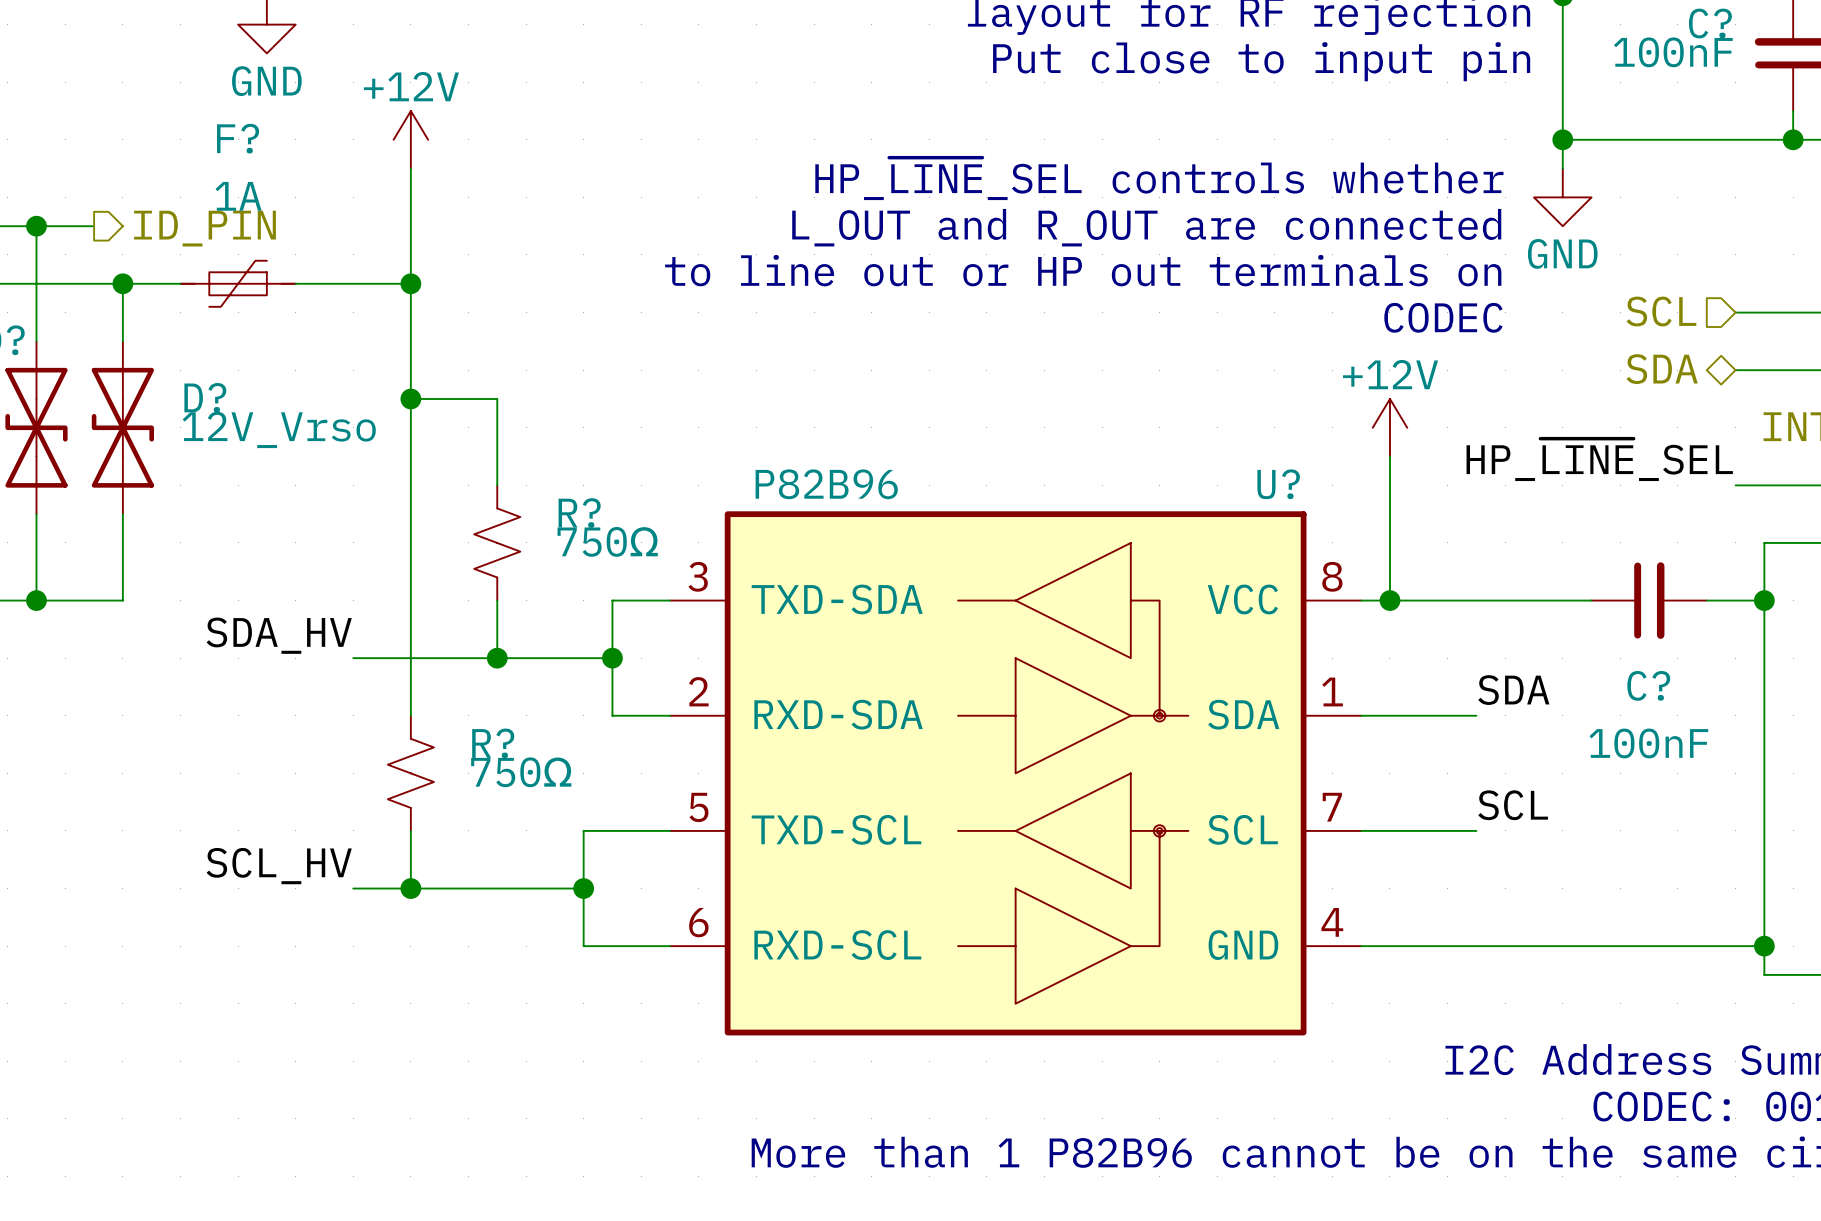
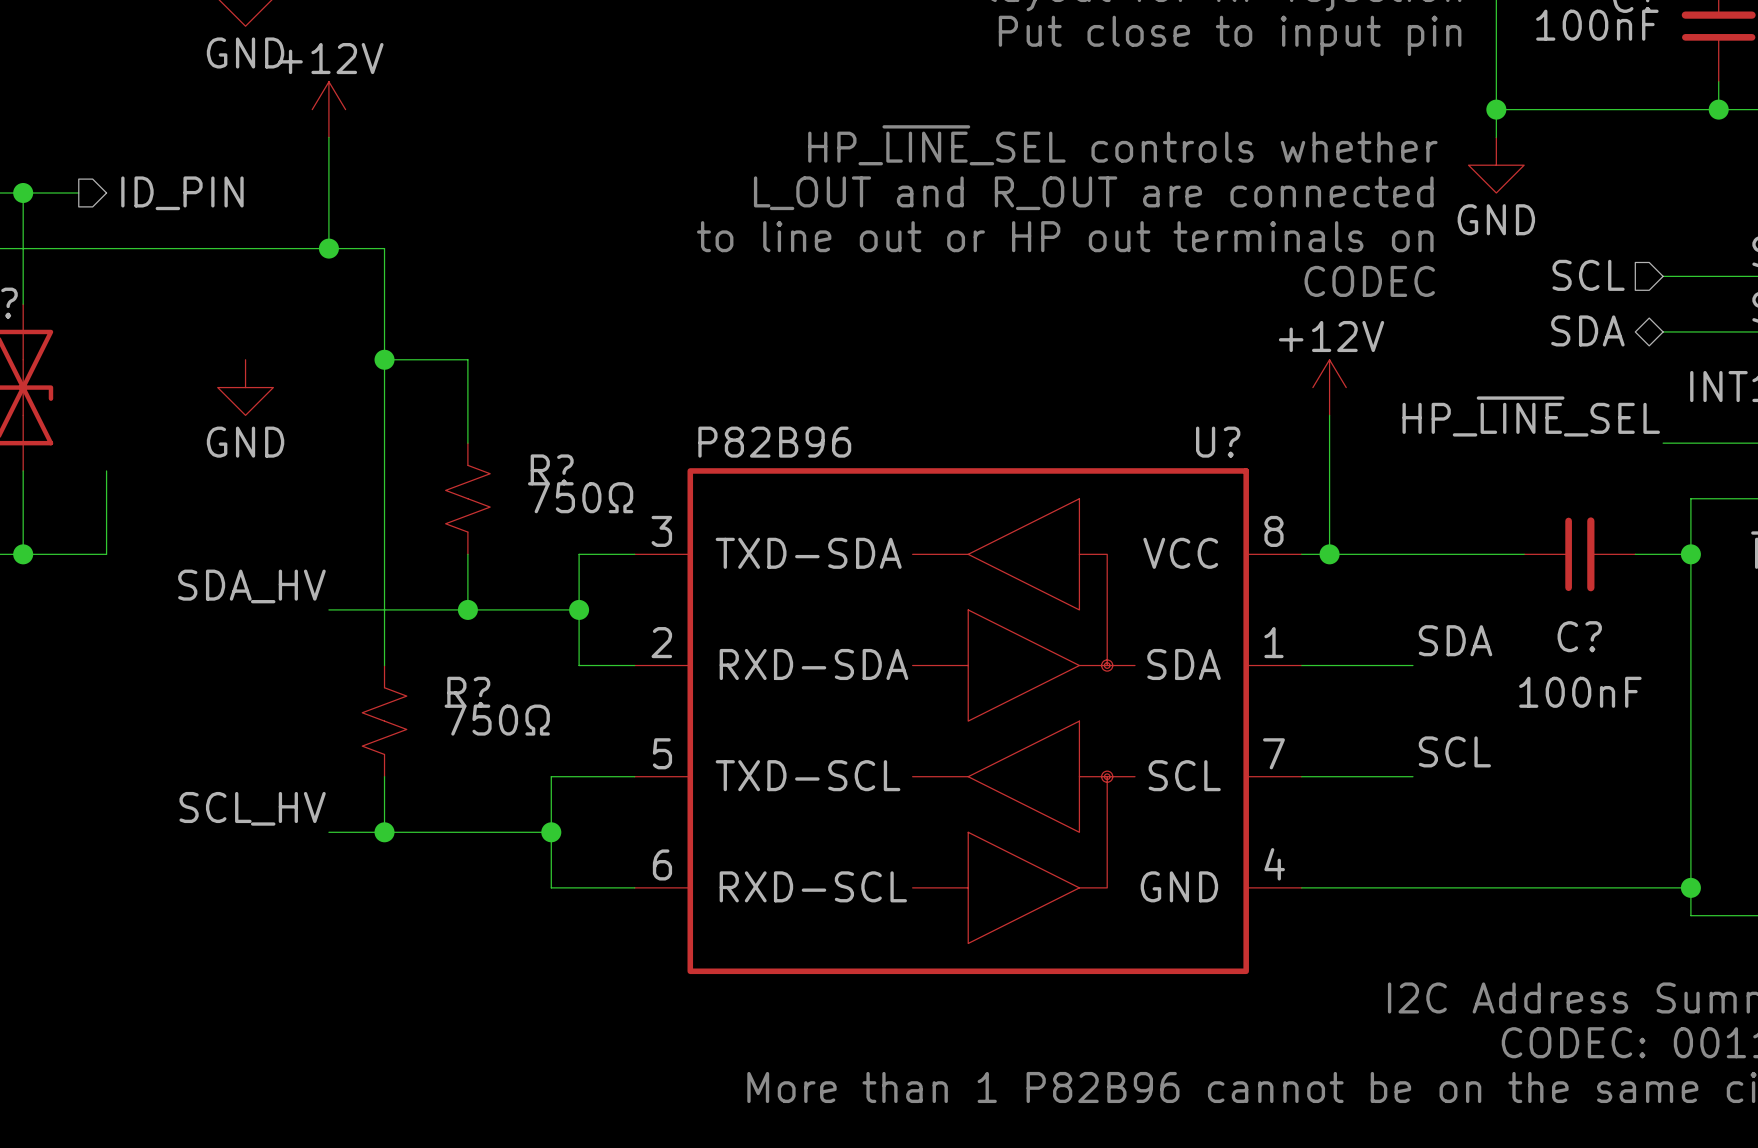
power symbol position: +12V (410, 139) -> +12V (328, 109)
wire: (410, 168) (410, 283) -> (328, 137) (328, 248)
wire: (122, 283) (122, 341) -> none
junction: (122, 283) -> none
F?: 1A (238, 283) -> none
junction position: (410, 283) -> (328, 248)
D?: 12V_Vrso (122, 427) -> none
power symbol: none -> GND (245, 387)

